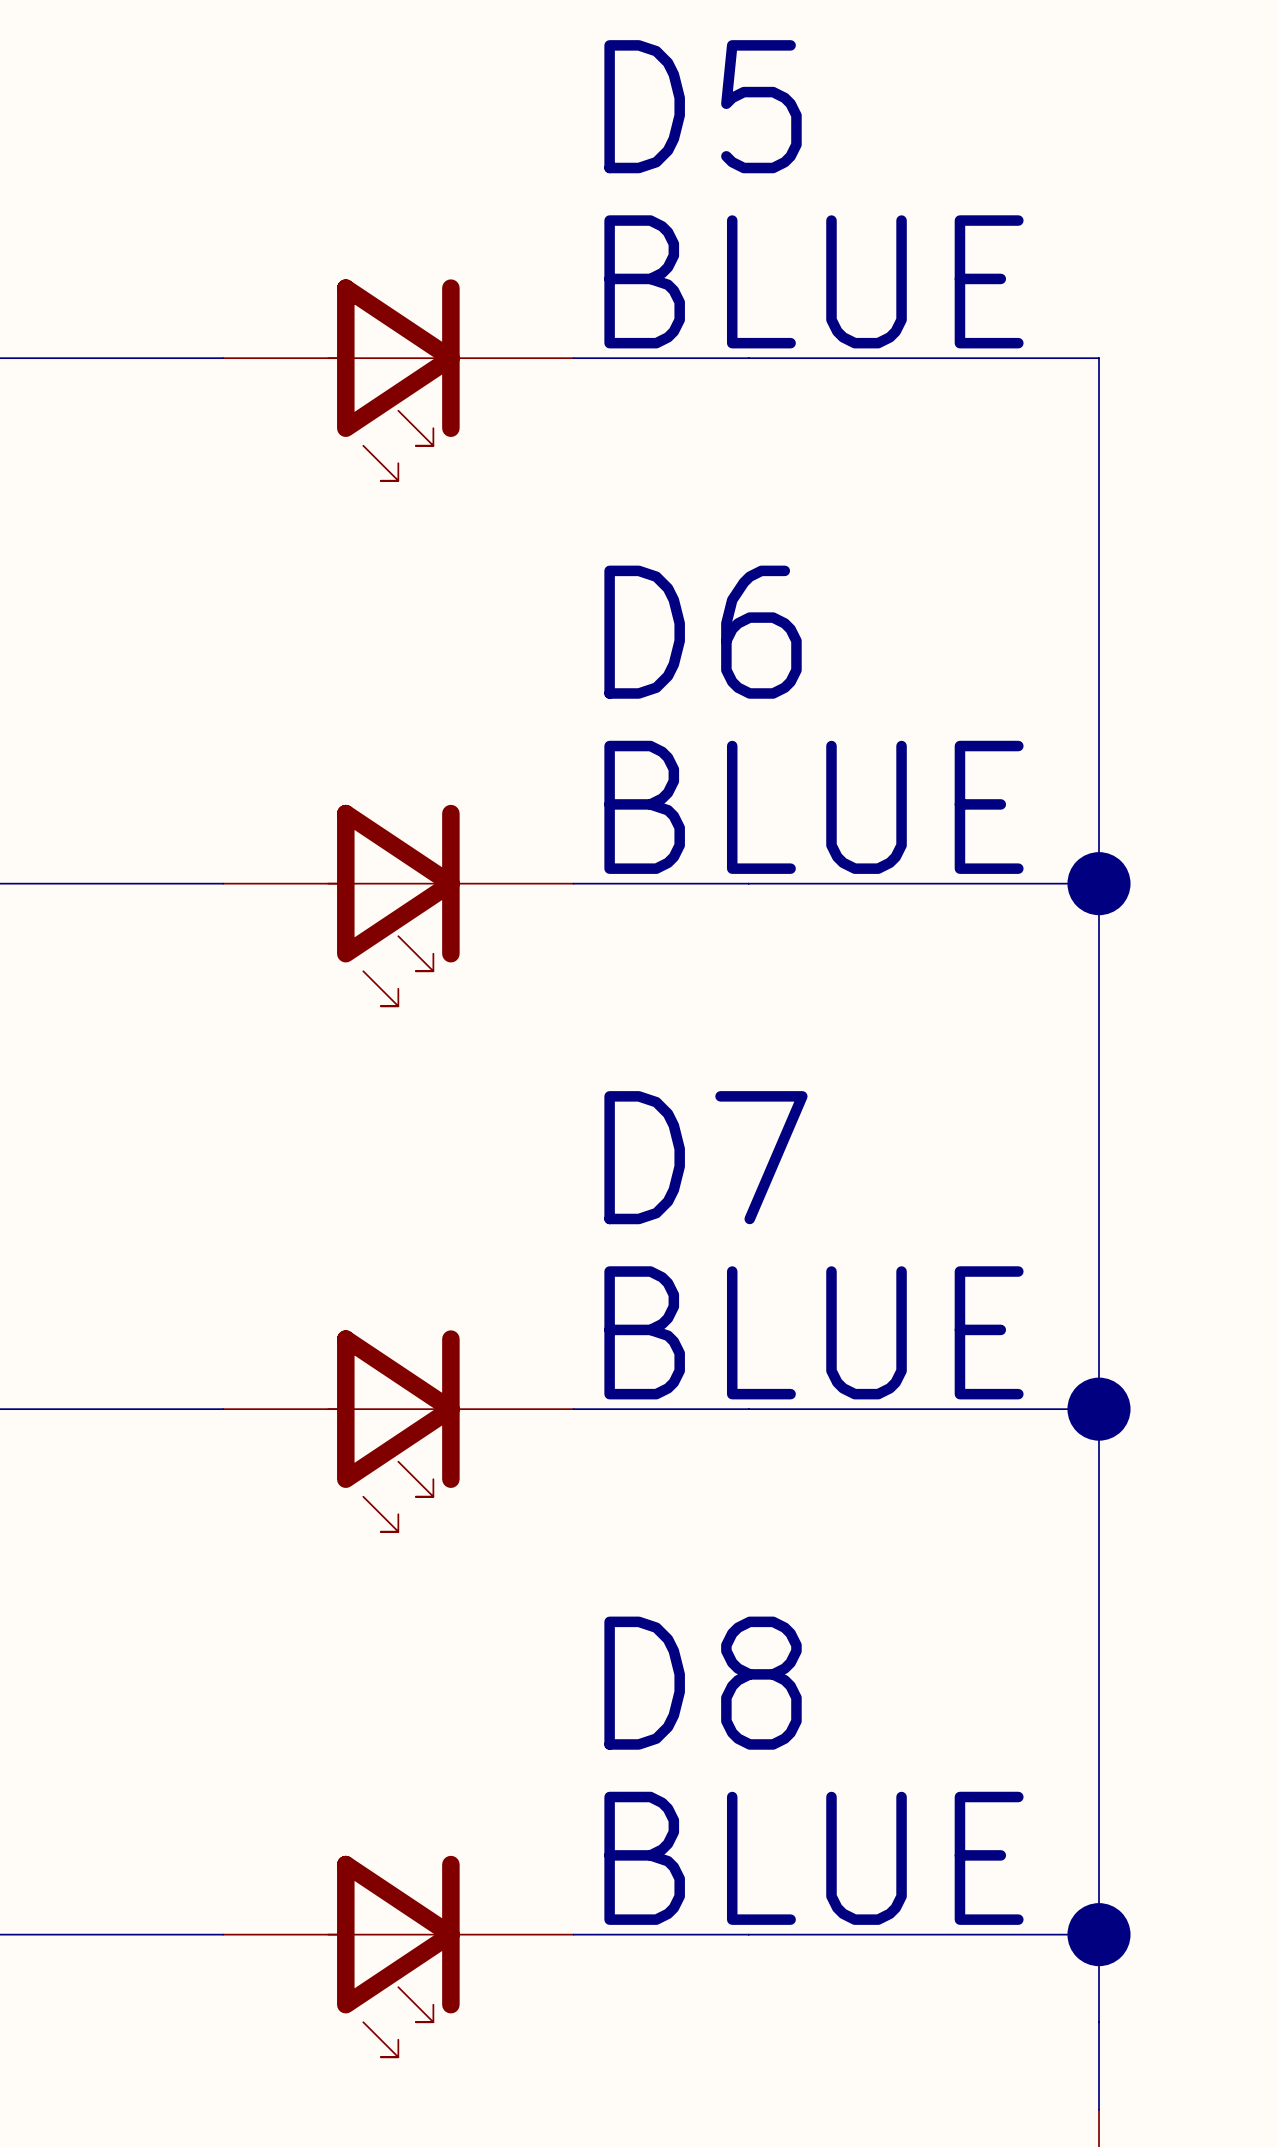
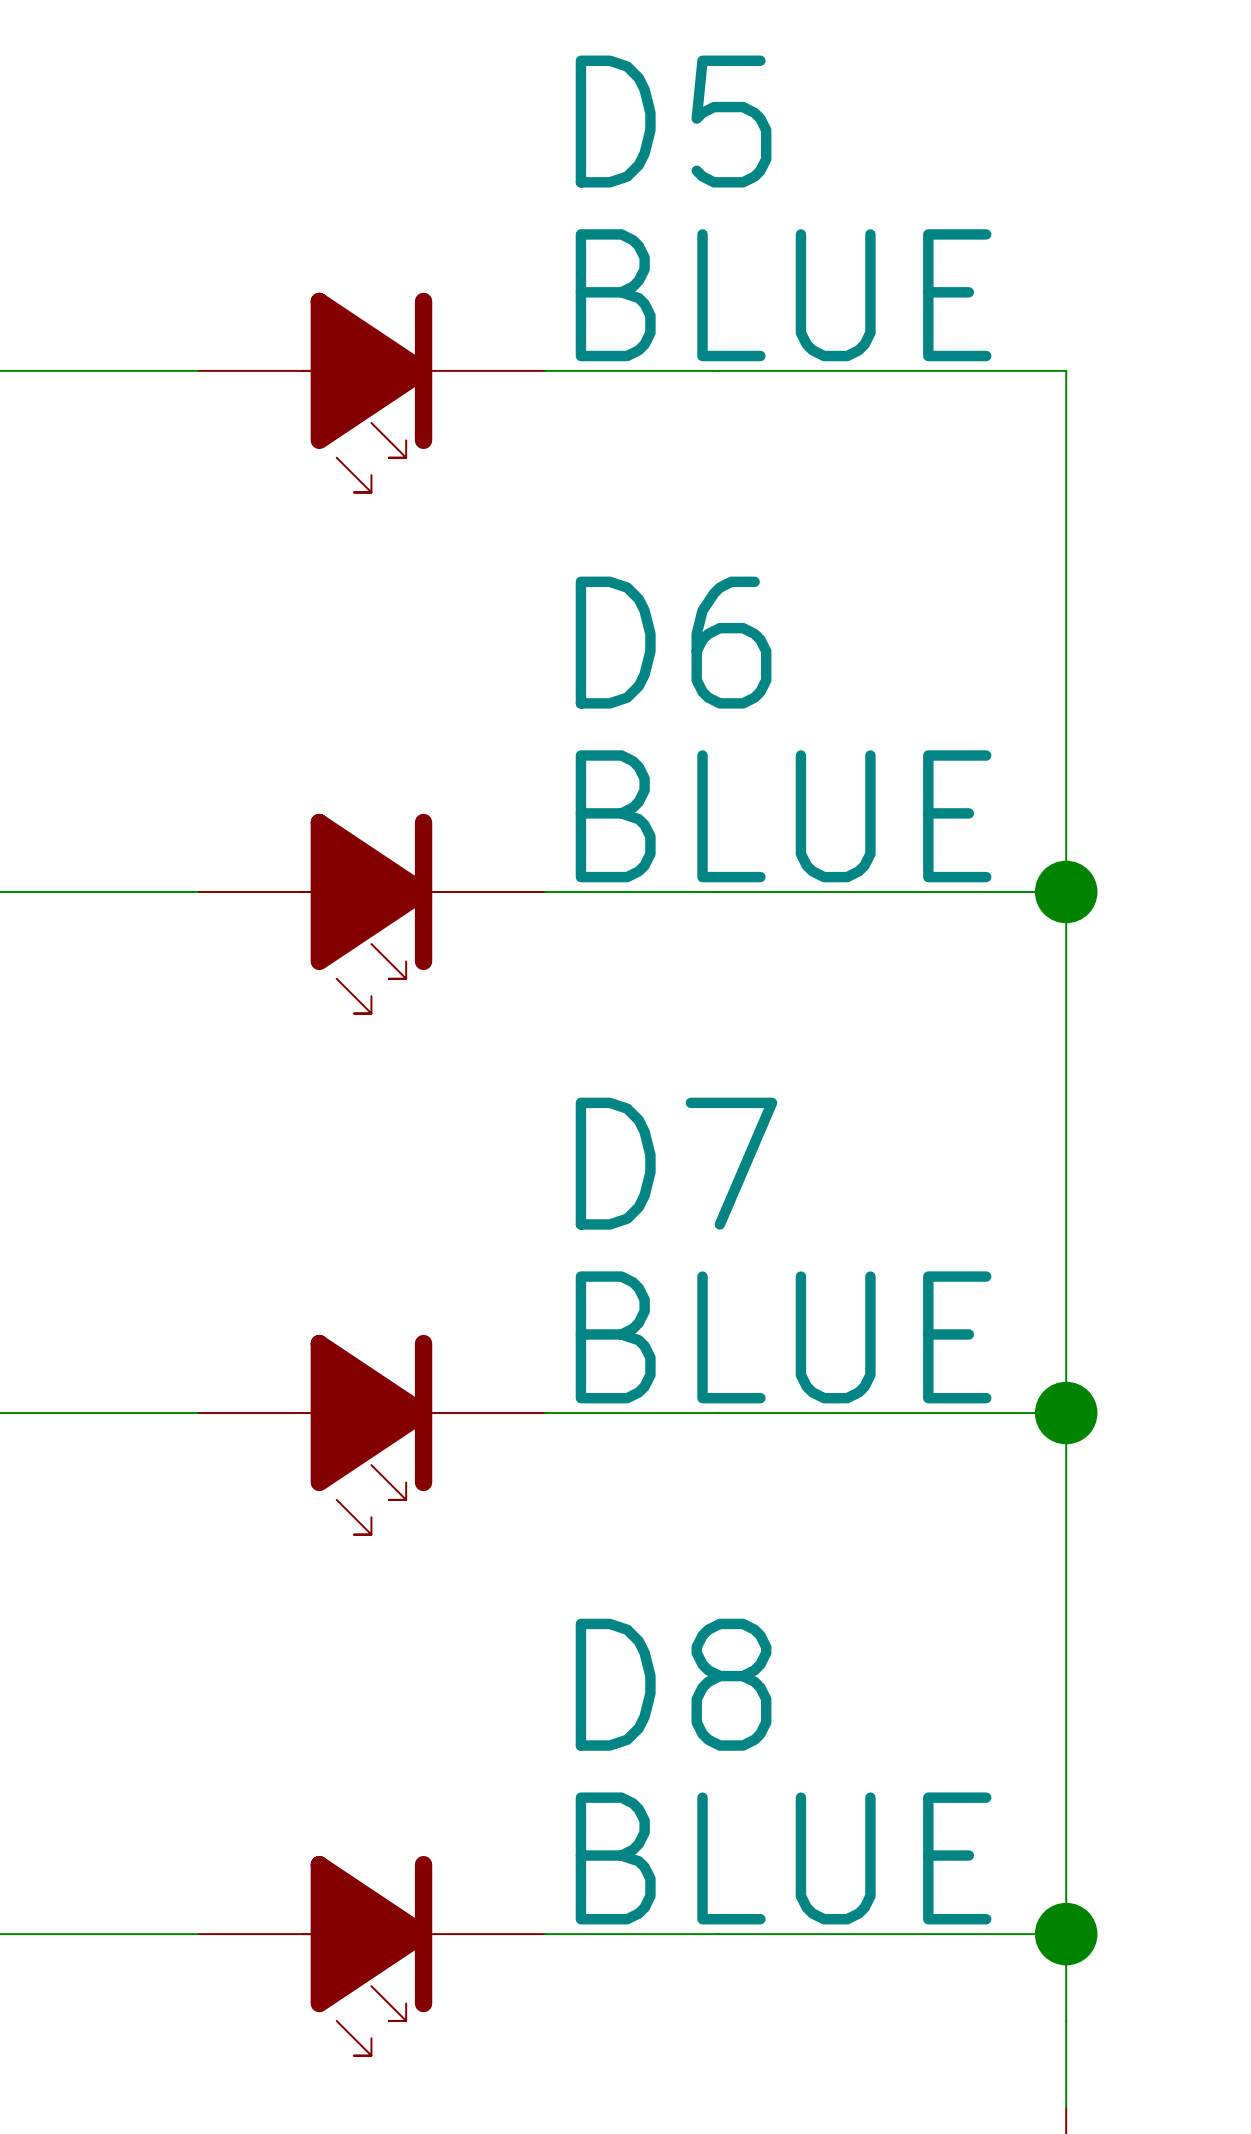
D5 symbol: [223, 279, 574, 481] -> [197, 292, 546, 493]
D6 symbol: [223, 804, 574, 1007] -> [197, 813, 546, 1014]
D7 symbol: [223, 1330, 574, 1532] -> [197, 1334, 546, 1535]
D8 symbol: [223, 1855, 574, 2058] -> [197, 1855, 546, 2056]

